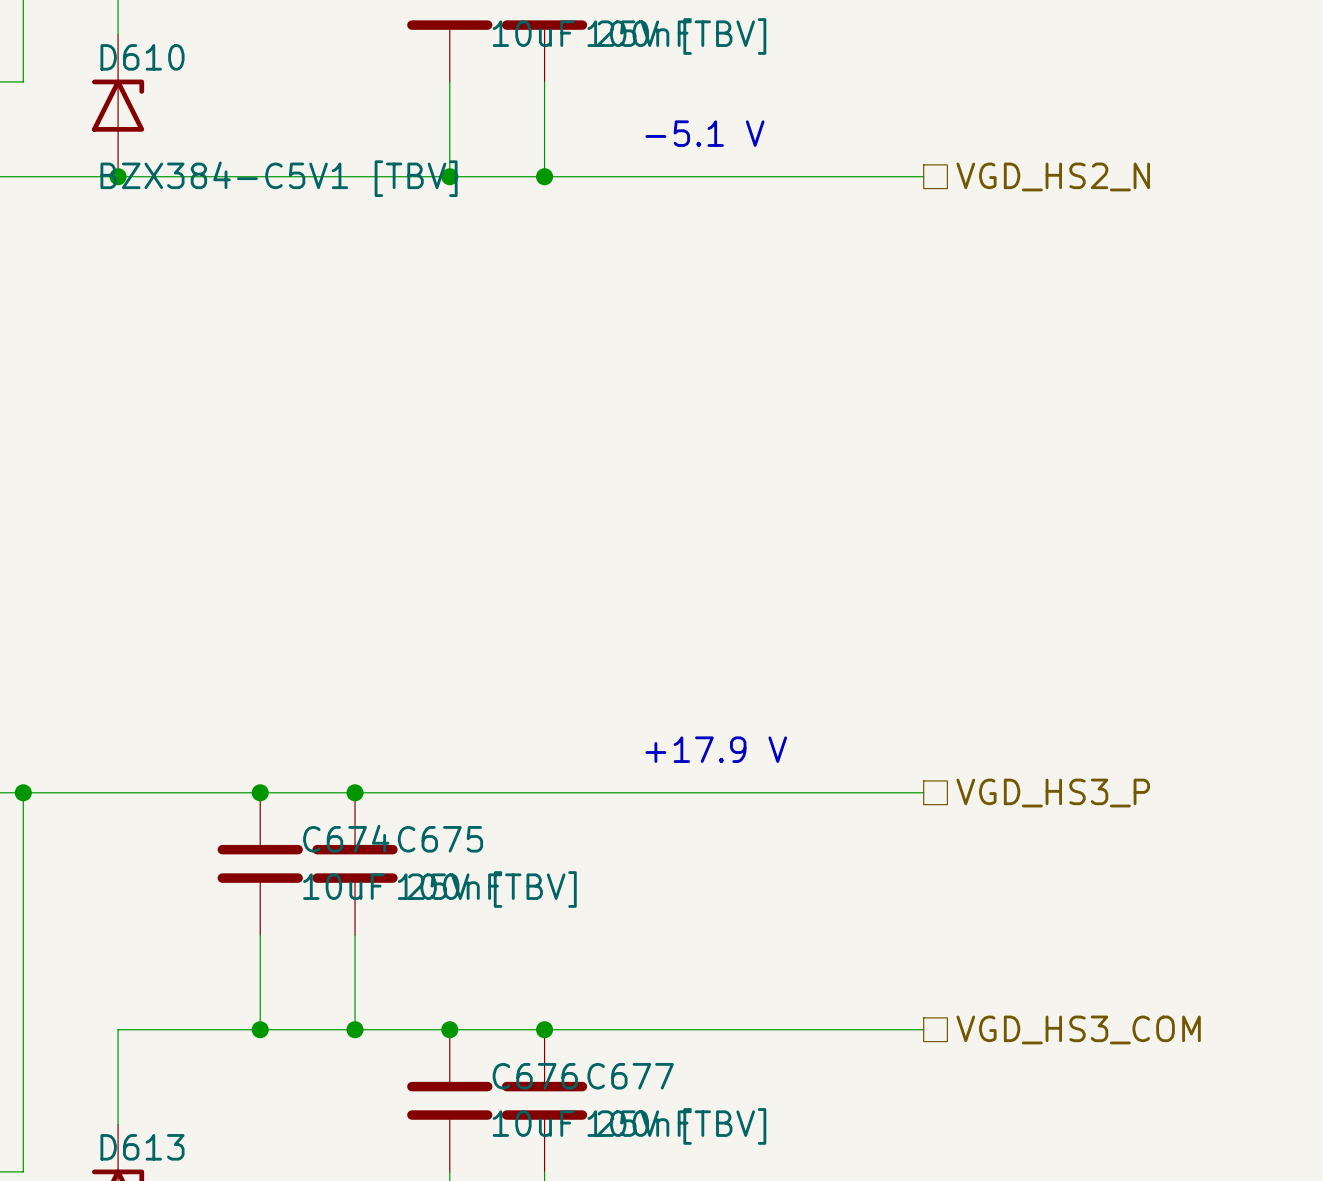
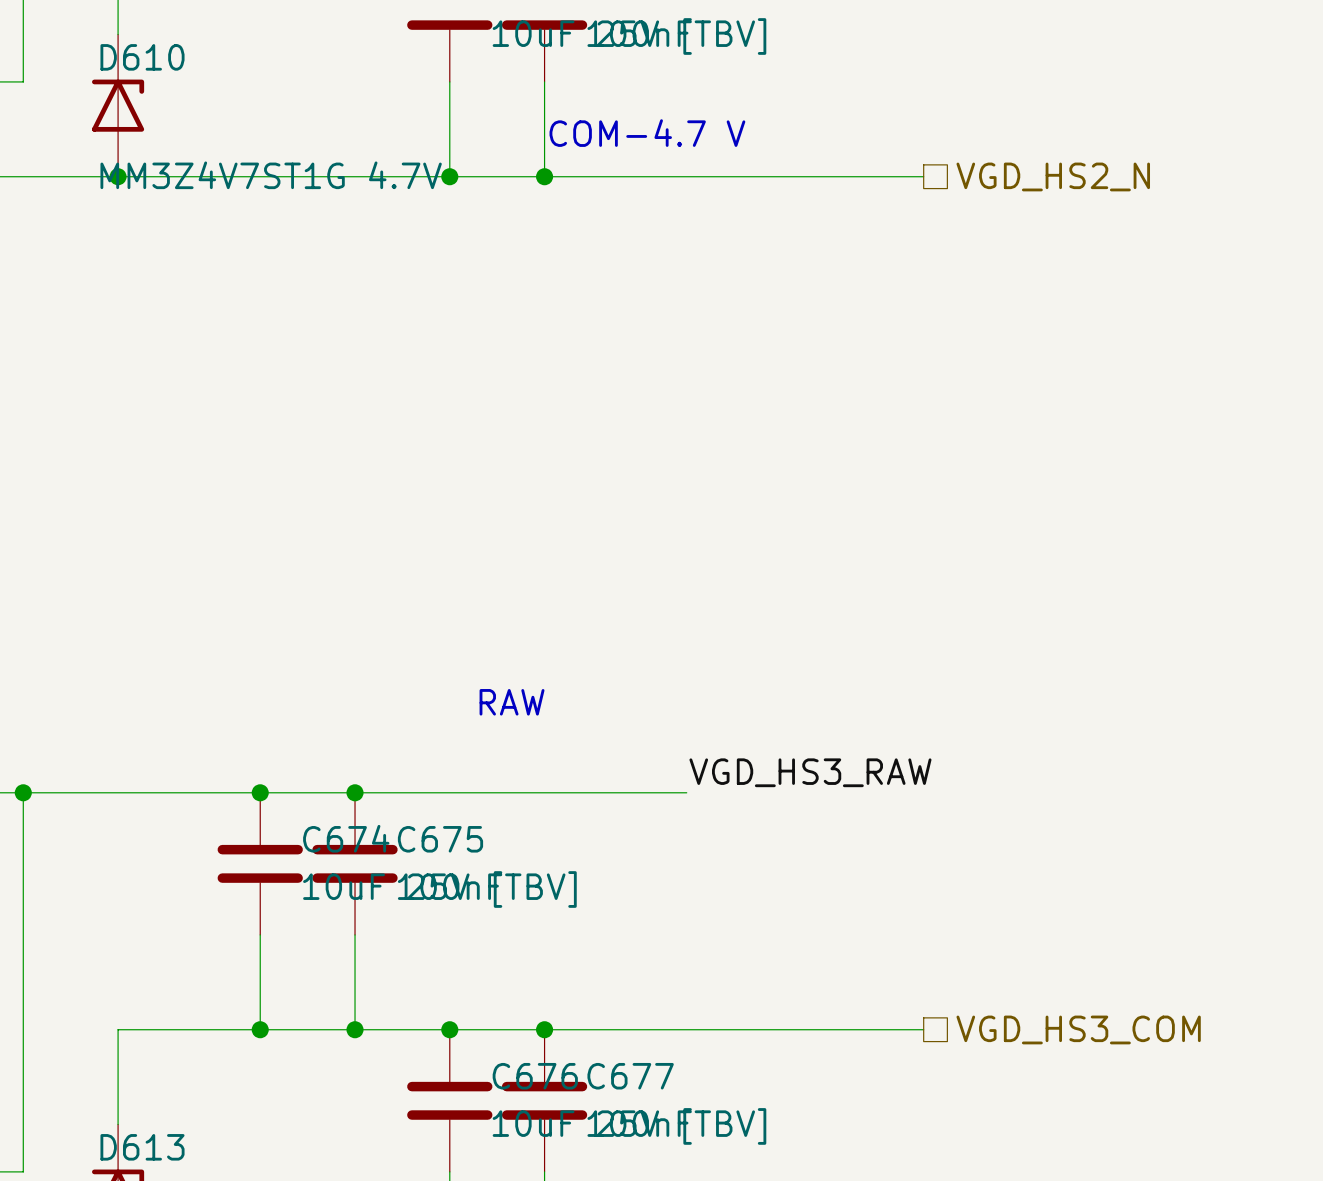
text: none -> COM-4.7 V (647, 133)
text: -5.1 V (704, 133) -> none
D610 value: BZX384-C5V1 [TBV] (279, 178) -> MM3Z4V7ST1G 4.7V (271, 175)
text: none -> RAW (512, 702)
text: +17.9 V (716, 749) -> none
label: none -> VGD_HS3_RAW (810, 772)
wire: (686, 792) (923, 792) -> none
hierarchical label: VGD_HS3_P (1053, 793) -> none

